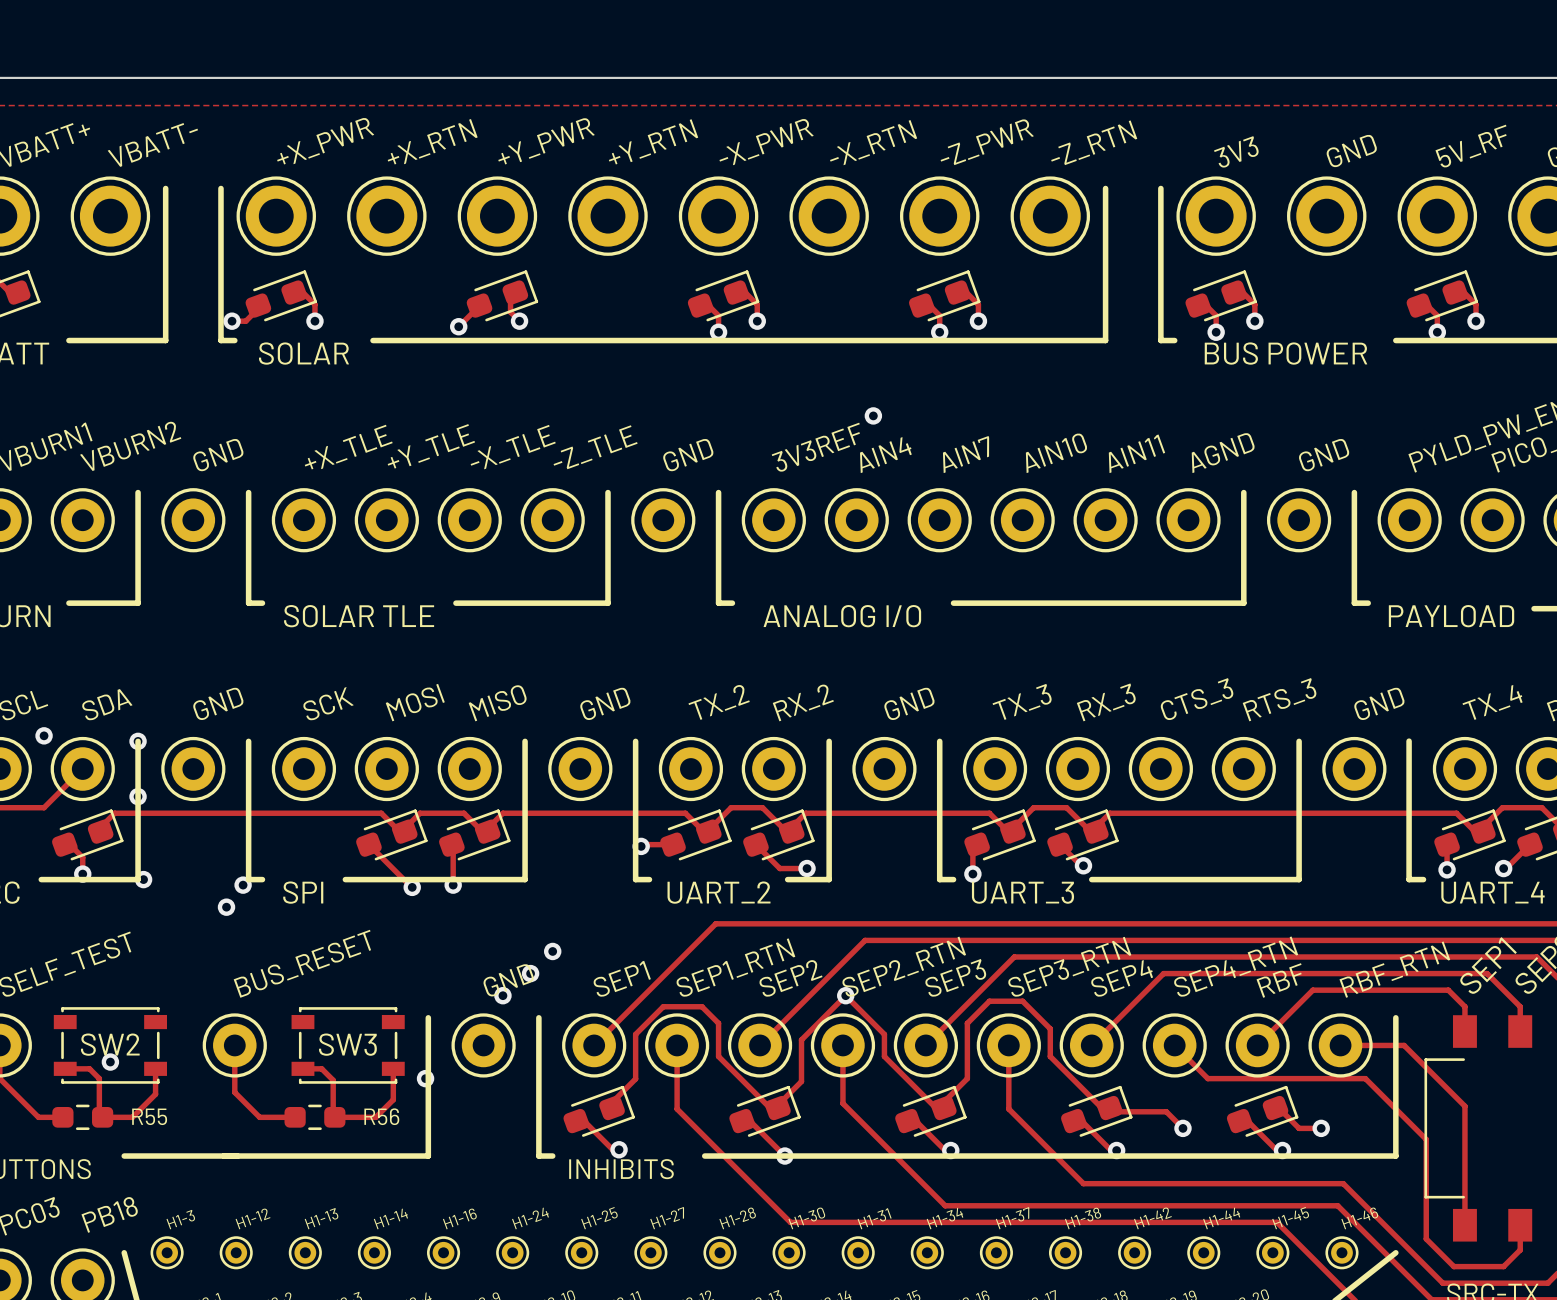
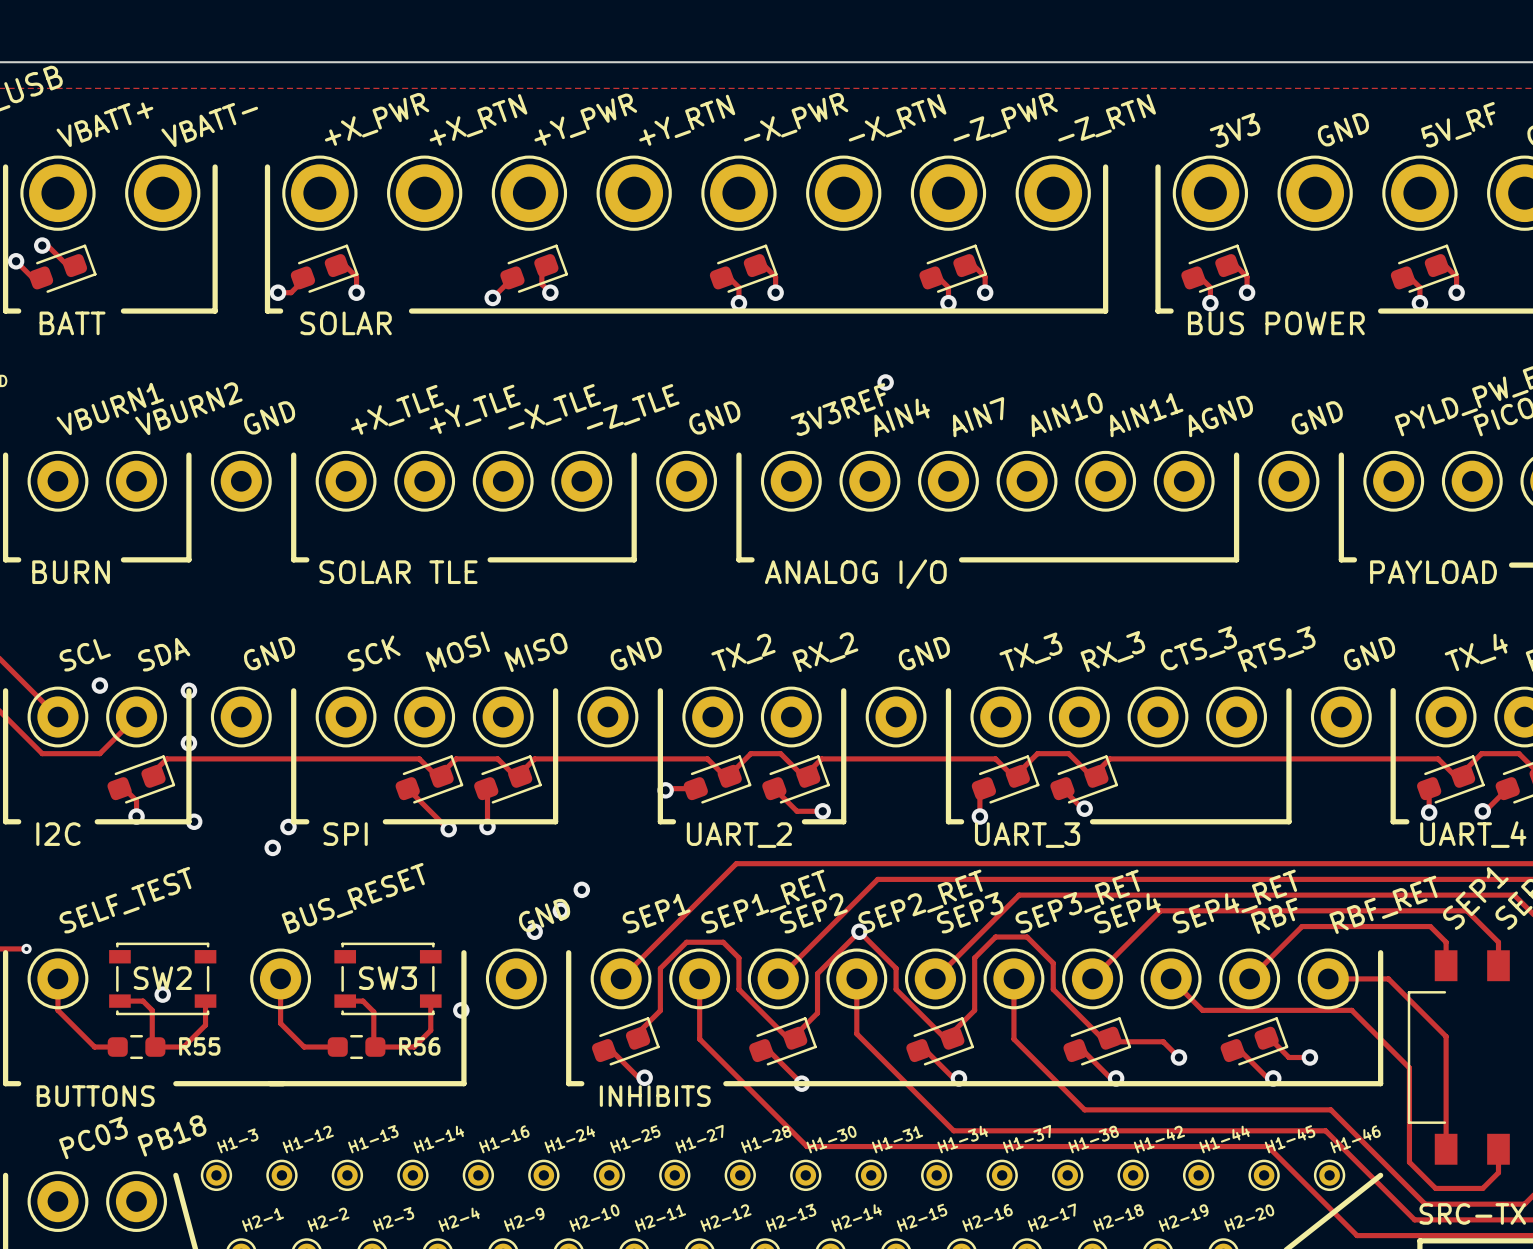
part value: SEP2_RTN (904, 966) -> SEP2_RET (920, 901)
part value: SEP3_RTN (1069, 966) -> SEP3_RET (1077, 901)
part value: SEP4_RTN (1235, 966) -> SEP4_RET (1234, 901)
part value: SEP1_RTN (735, 967) -> SEP1_RET (763, 901)
part value: RBF_RTN (1394, 969) -> RBF_RET (1383, 904)

